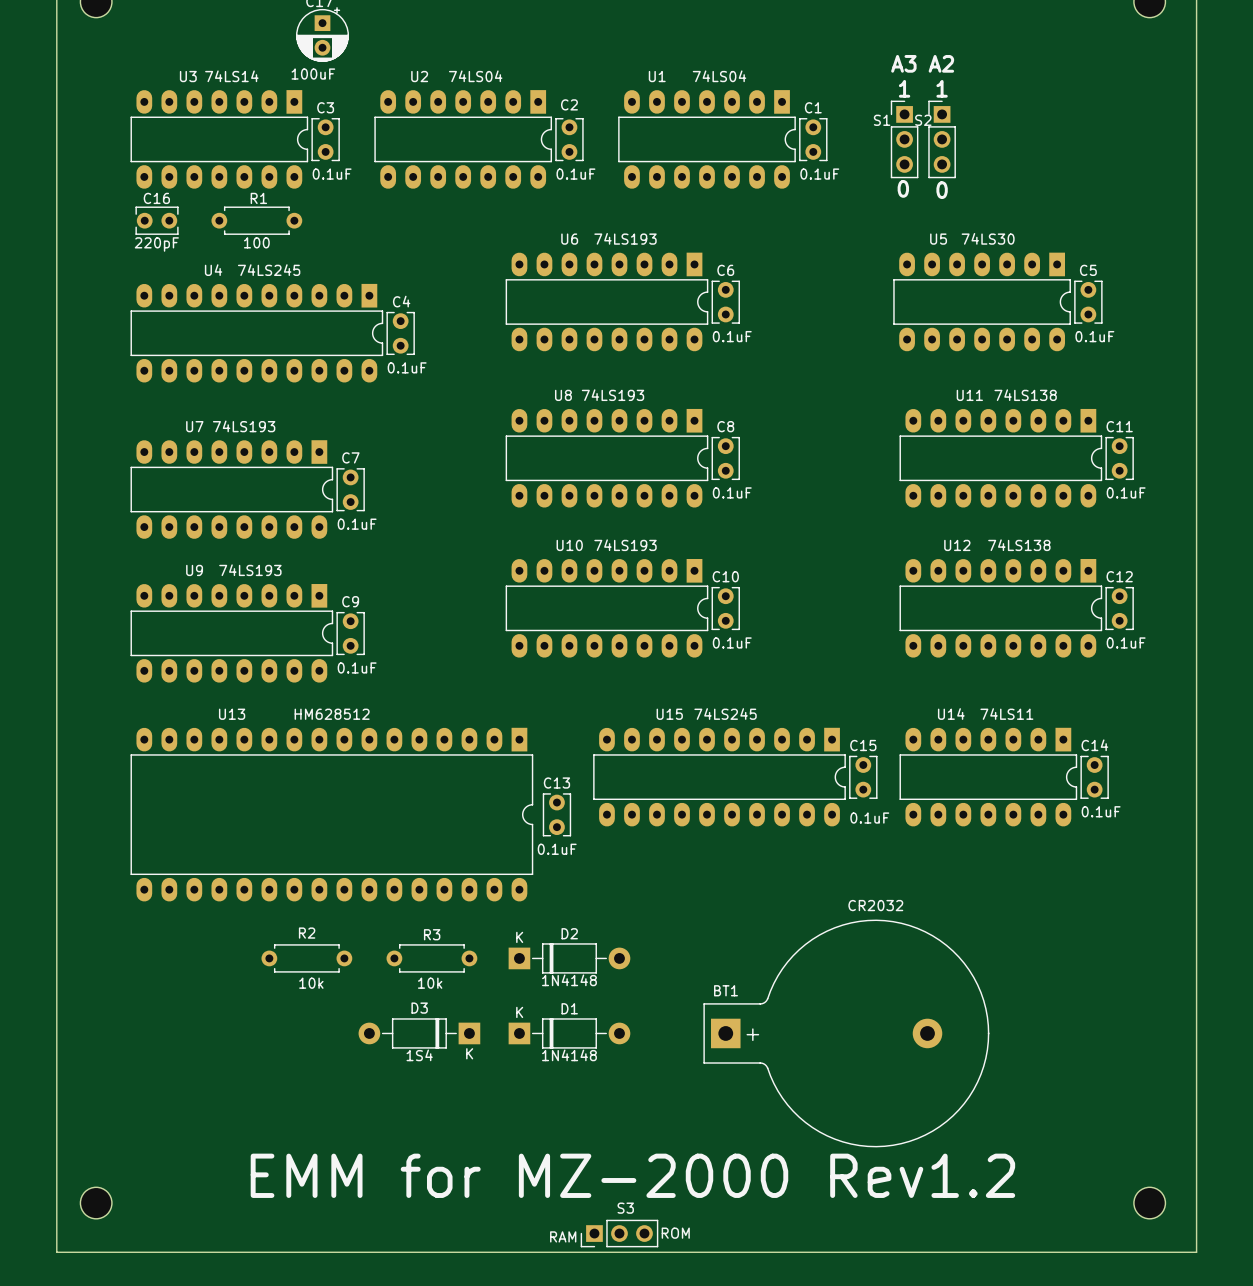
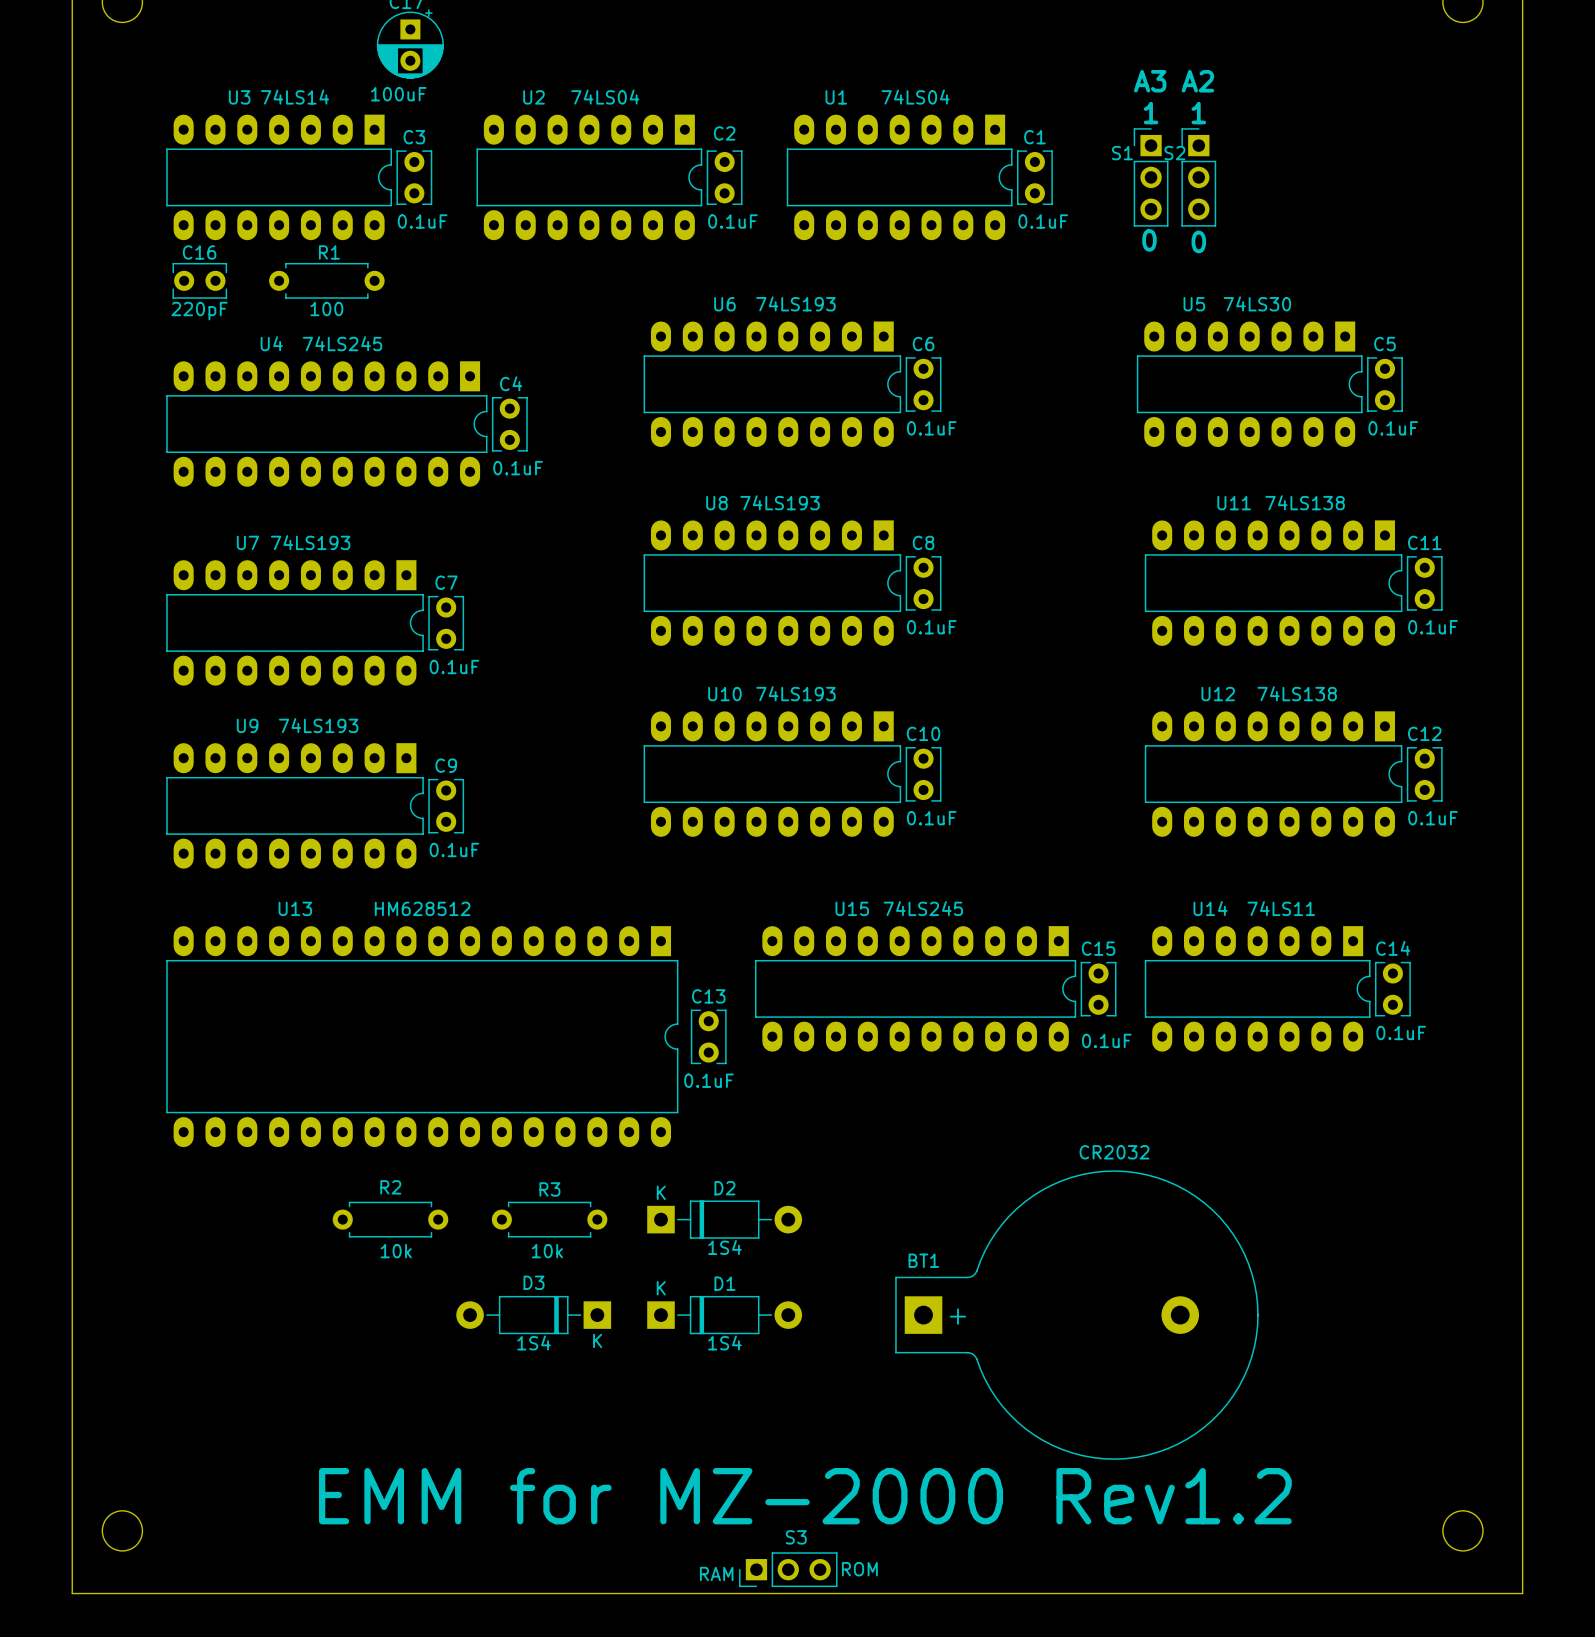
text: 1N4148 (569, 980) -> 1S4 (724, 1247)
text: 1N4148 (569, 1055) -> 1S4 (724, 1342)

